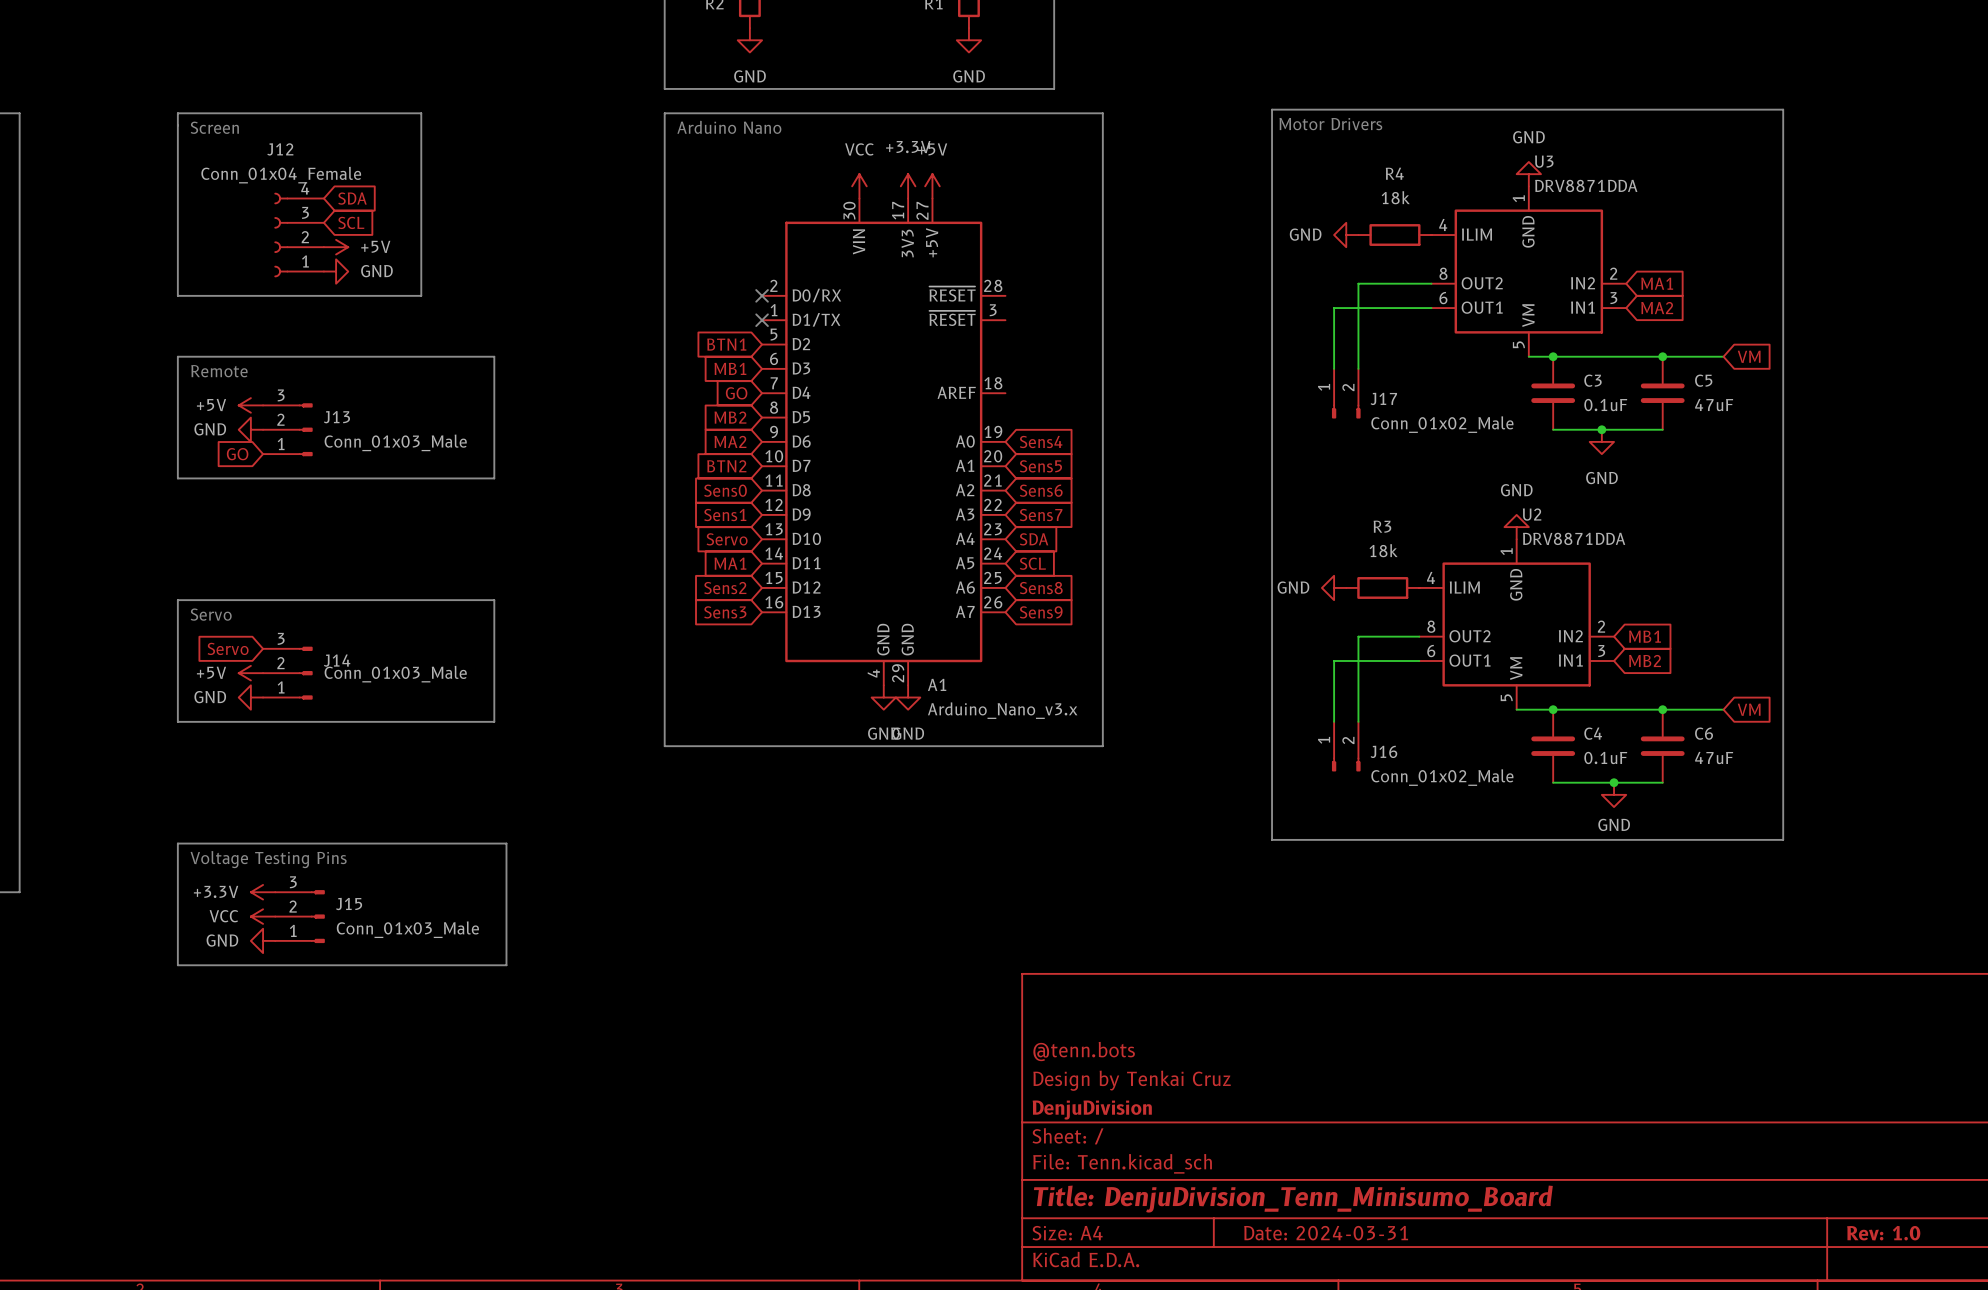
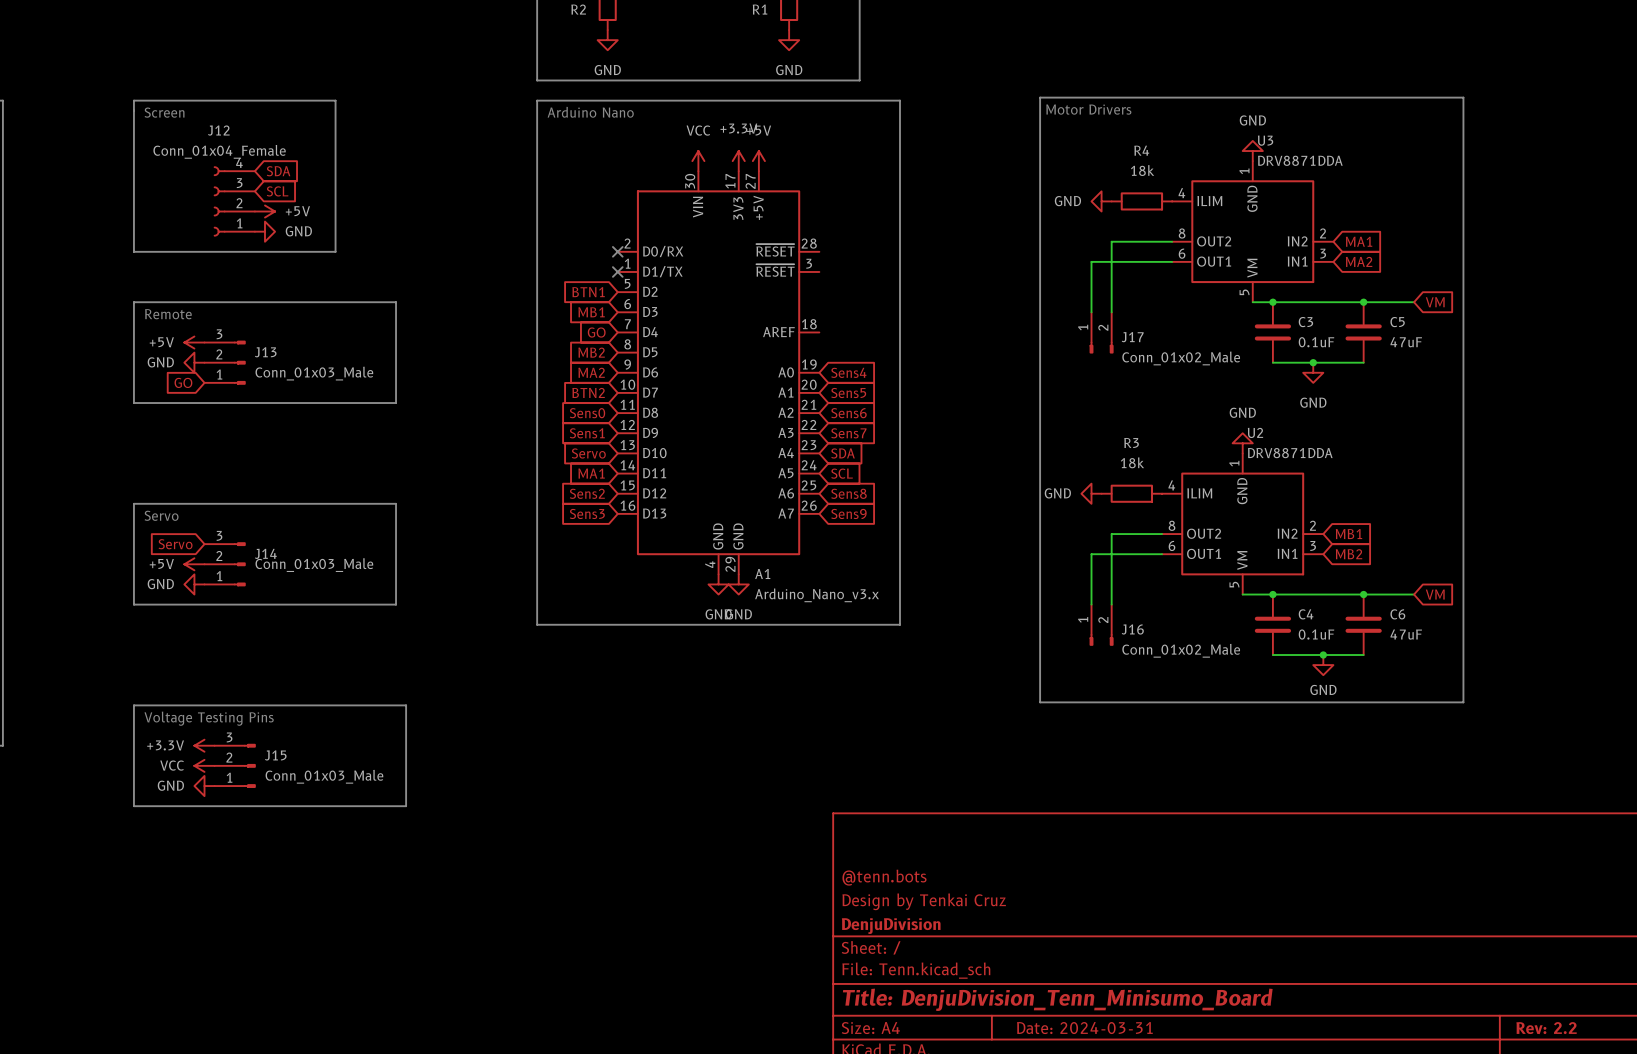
title block: Rev: 1.0 (1883, 1233) -> Rev: 2.2 (1546, 1028)

